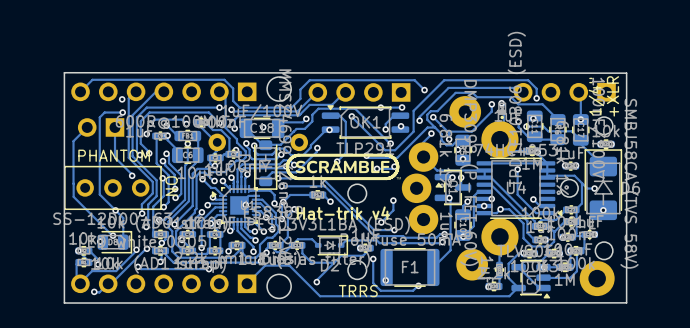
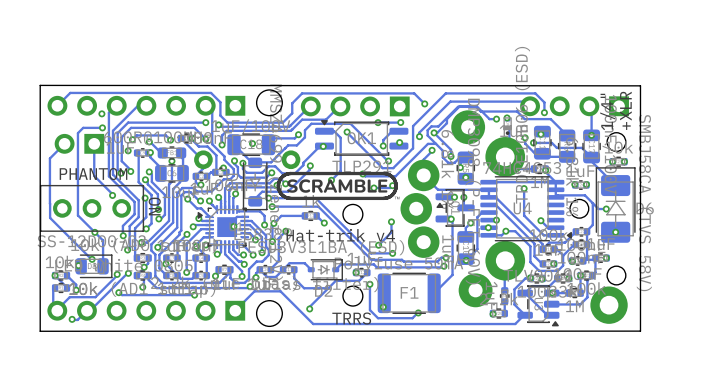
track: (491, 104) (491, 111) (471, 131) (449, 133) -> (496, 119) (489, 119) (476, 106) (459, 106) (446, 119) (446, 123) (437, 132) (434, 132)

